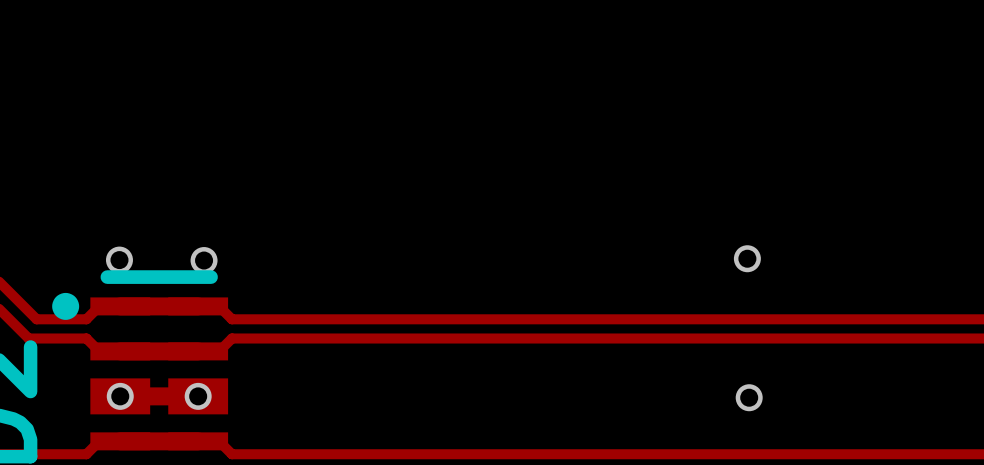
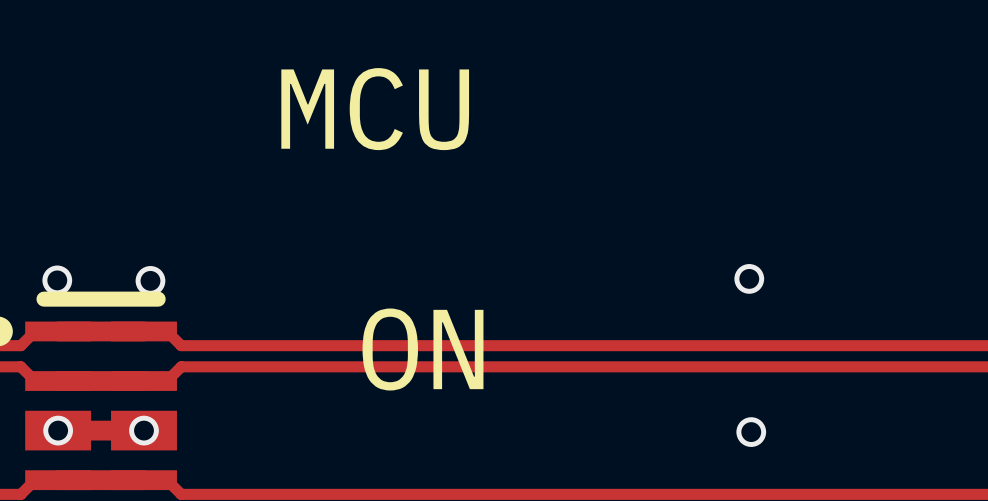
text: none -> MCU (375, 109)
text: none -> ON (423, 349)

